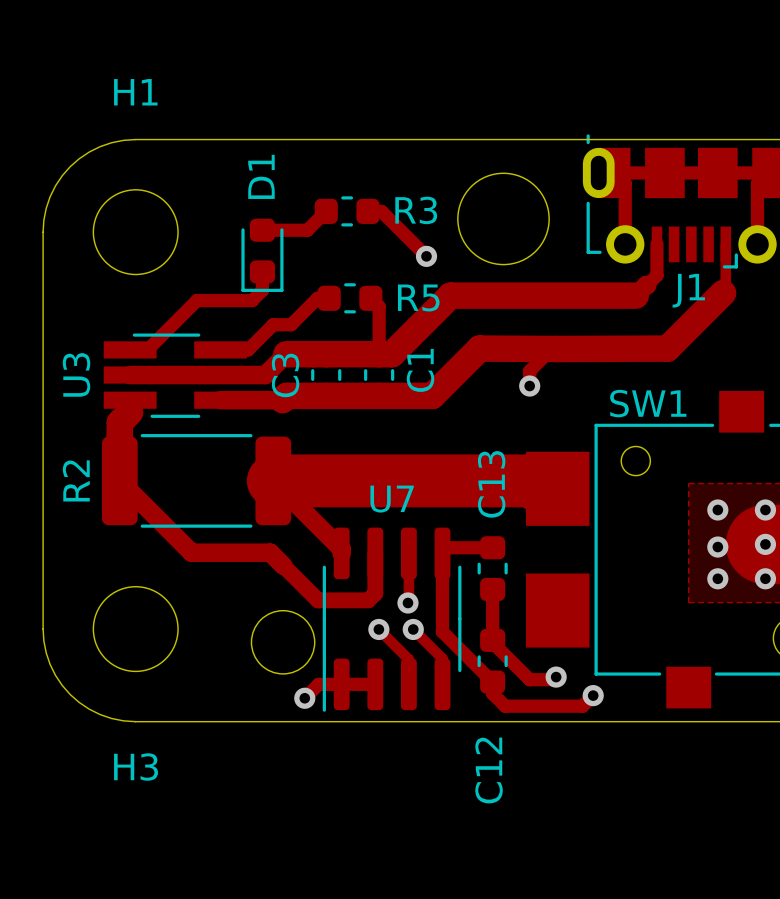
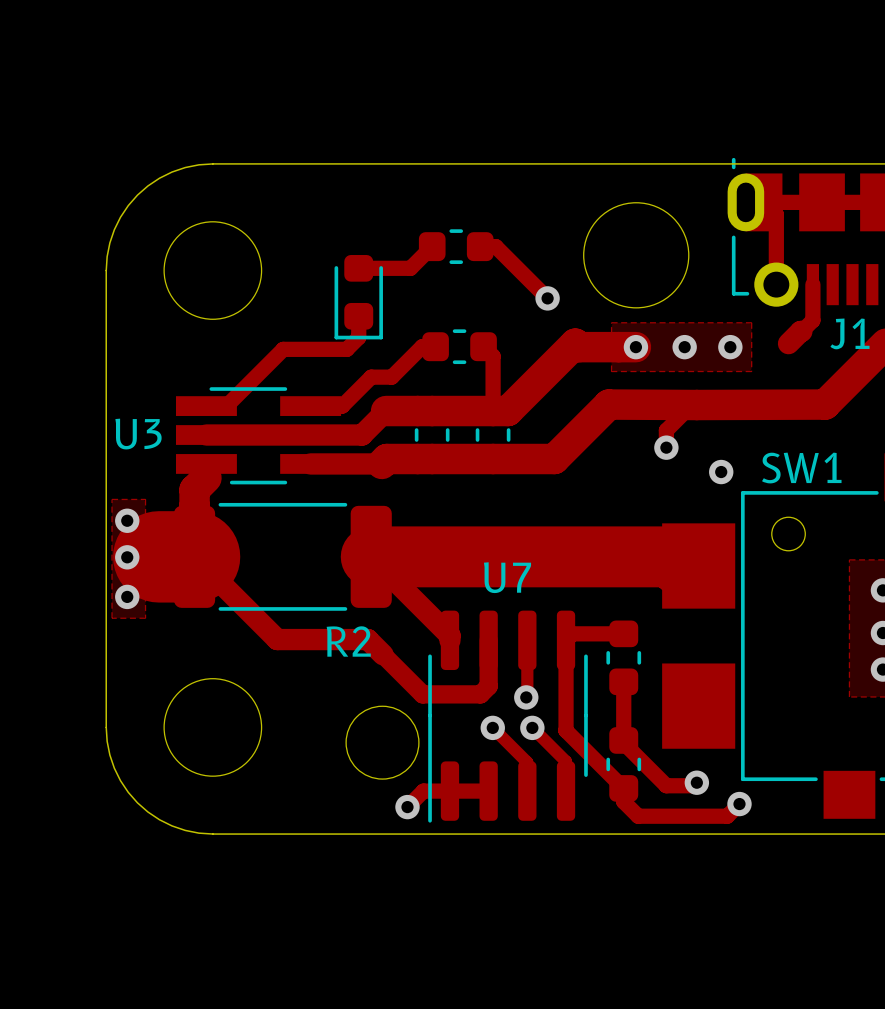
H1 name: H1 (135, 92) -> none
D1 name: D1 (261, 176) -> none
R3 name: R3 (416, 210) -> none
zone outline: none -> (611, 322) (611, 371) (751, 371) (751, 322) (611, 322)
track: (450, 295) (635, 295) -> (575, 343) (578, 347) (635, 347)
R5 name: R5 (418, 297) -> none
via: none -> (635, 347)
via: none -> (684, 347)
via: none -> (730, 347)
C1 name: C1 (420, 370) -> none
U3 name rotation: 0° (76, 374) -> 90° clockwise (138, 434)
C3 name: C3 (285, 375) -> none
via: none -> (721, 472)
zone outline: none -> (112, 499) (112, 618) (145, 618) (145, 499) (112, 499)
via: none -> (127, 520)
R2 name rotation: 0° (76, 480) -> 90° clockwise (348, 641)
R2 name position: R2 (76, 480) -> R2 (348, 641)
track: none -> (158, 556) (194, 556)
via: none -> (127, 557)
C13 name: C13 (491, 484) -> none
via: none -> (127, 596)
H3 name: H3 (136, 767) -> none
C12 name: C12 (489, 770) -> none

